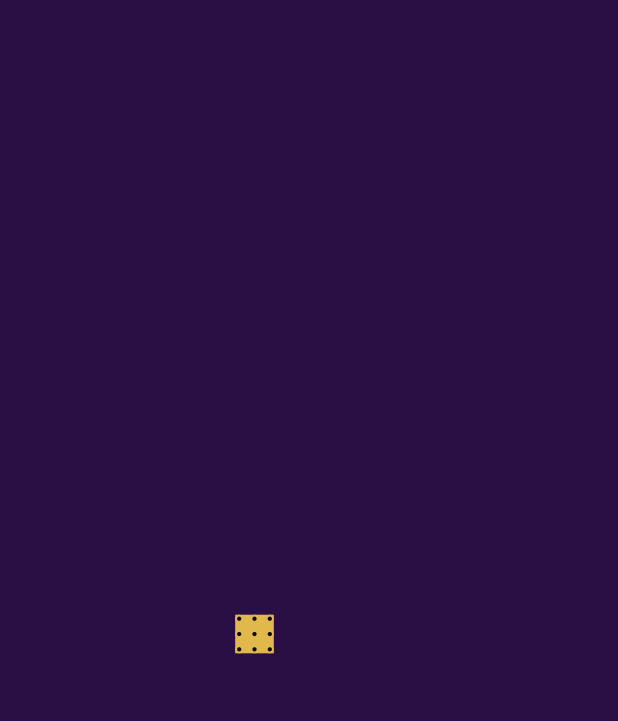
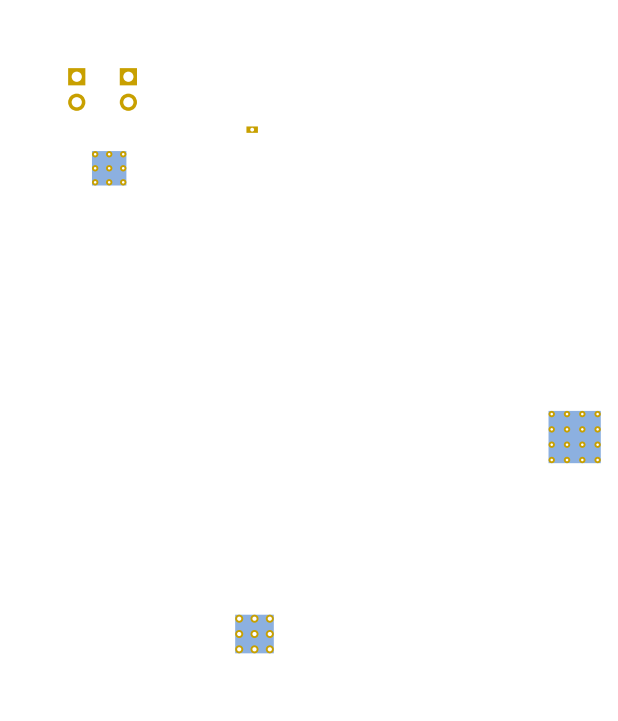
part: none -> (76, 89)
part: none -> (128, 89)
part: none -> (252, 129)
part: none -> (109, 168)
part: none -> (574, 437)

